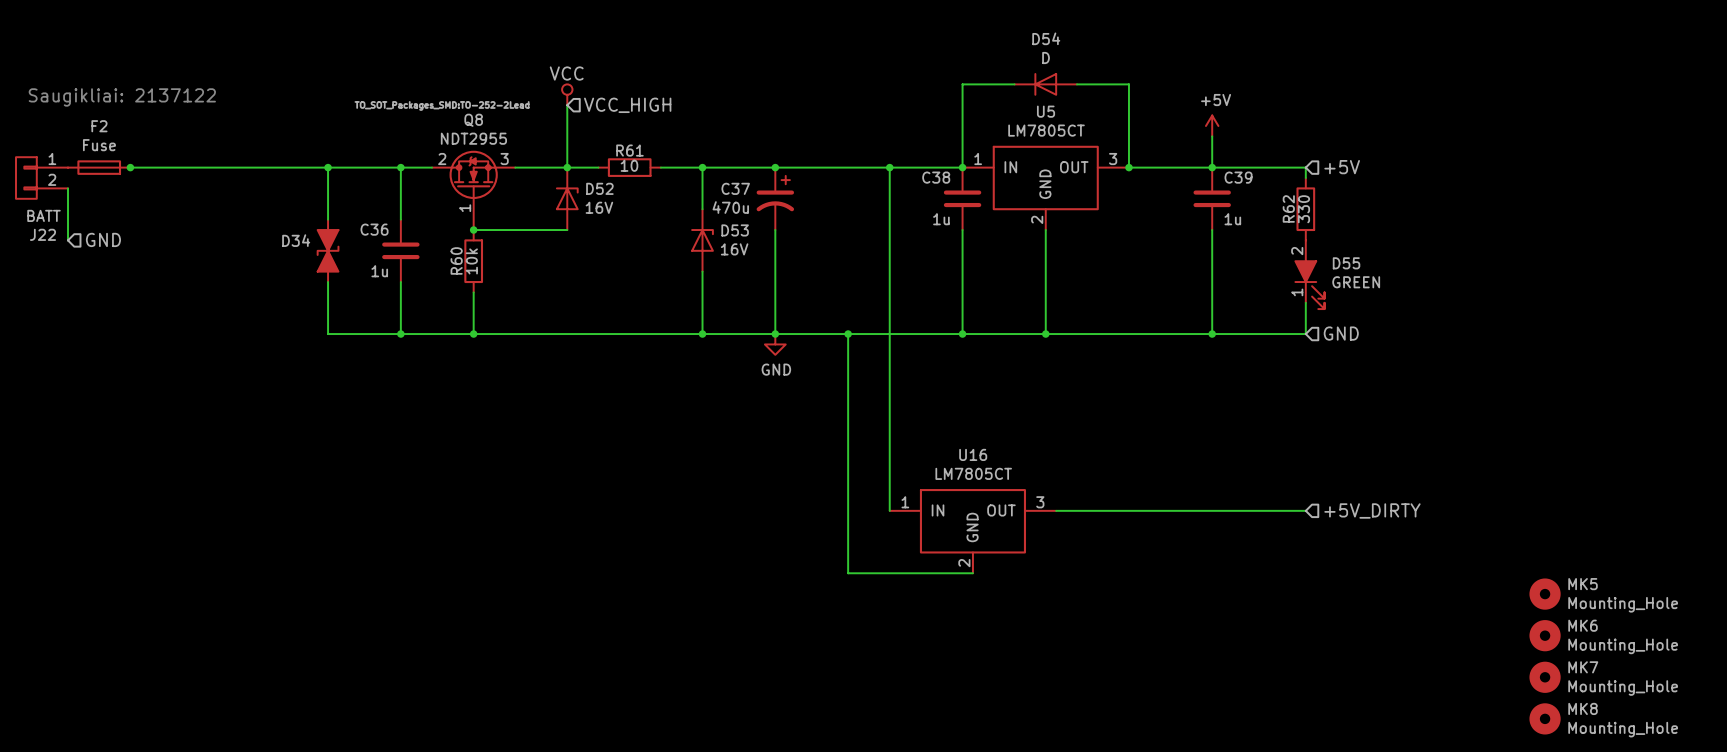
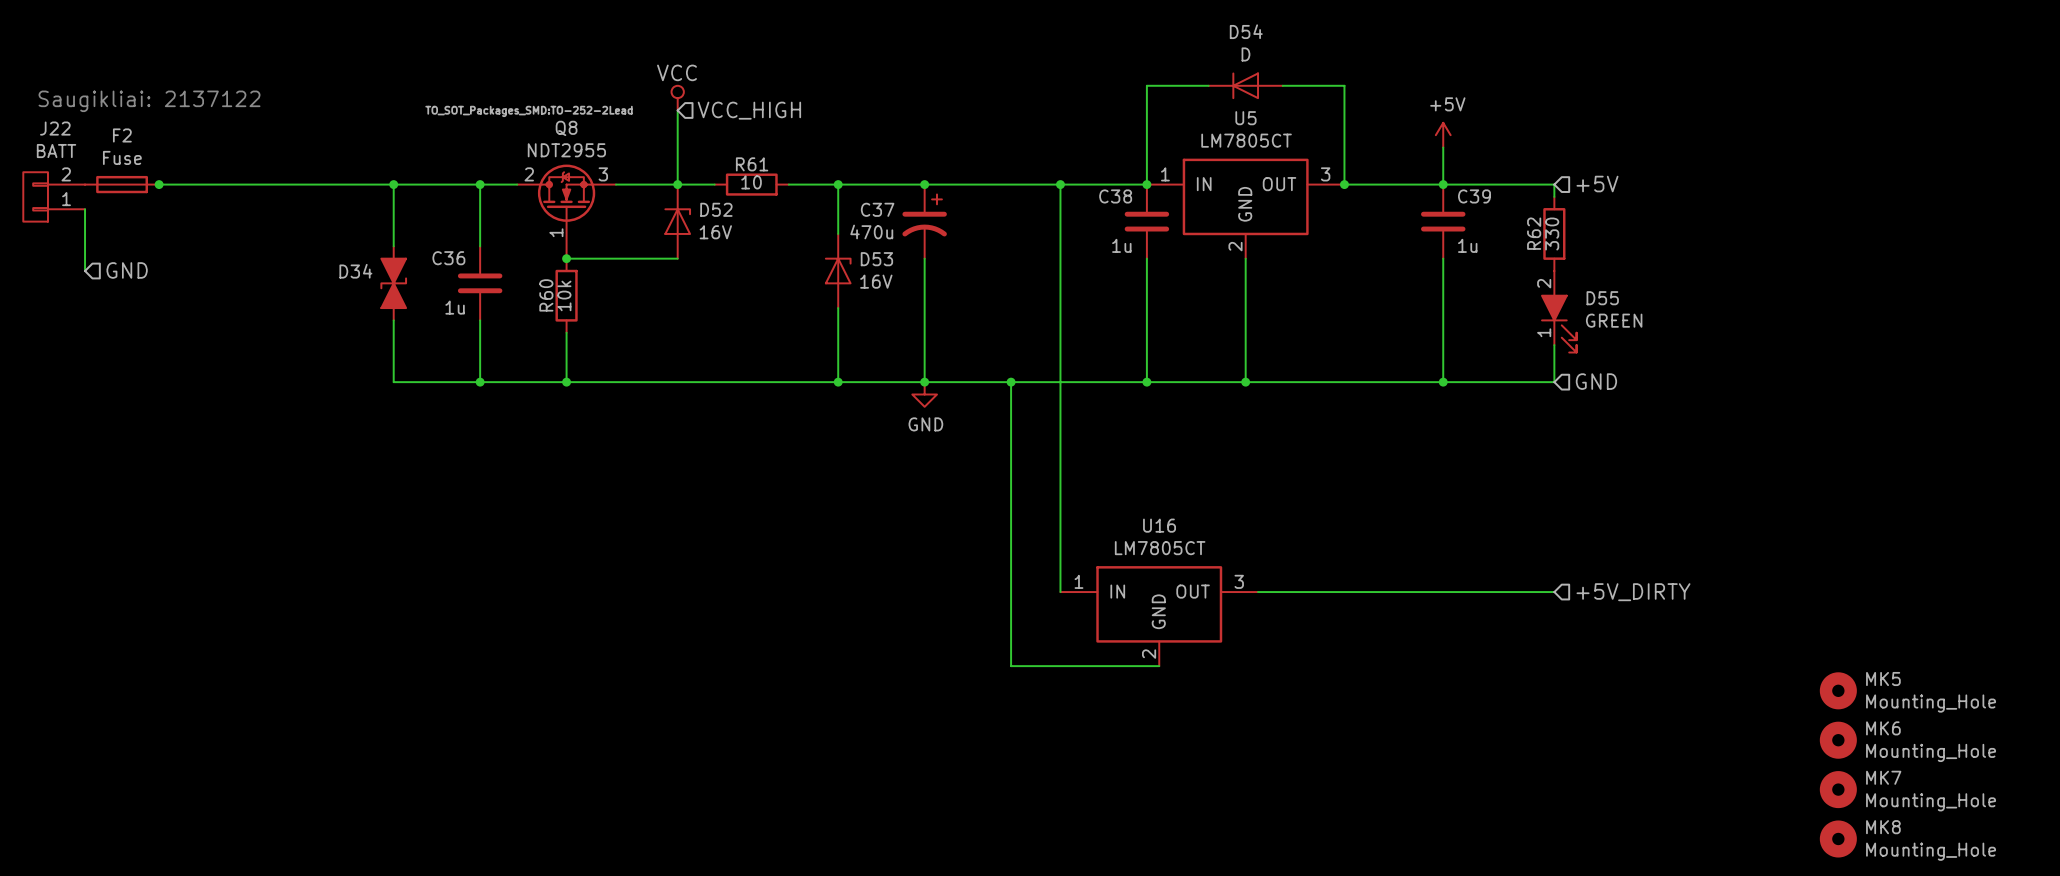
J22 flip: as is (26, 178) -> up-down (35, 196)

